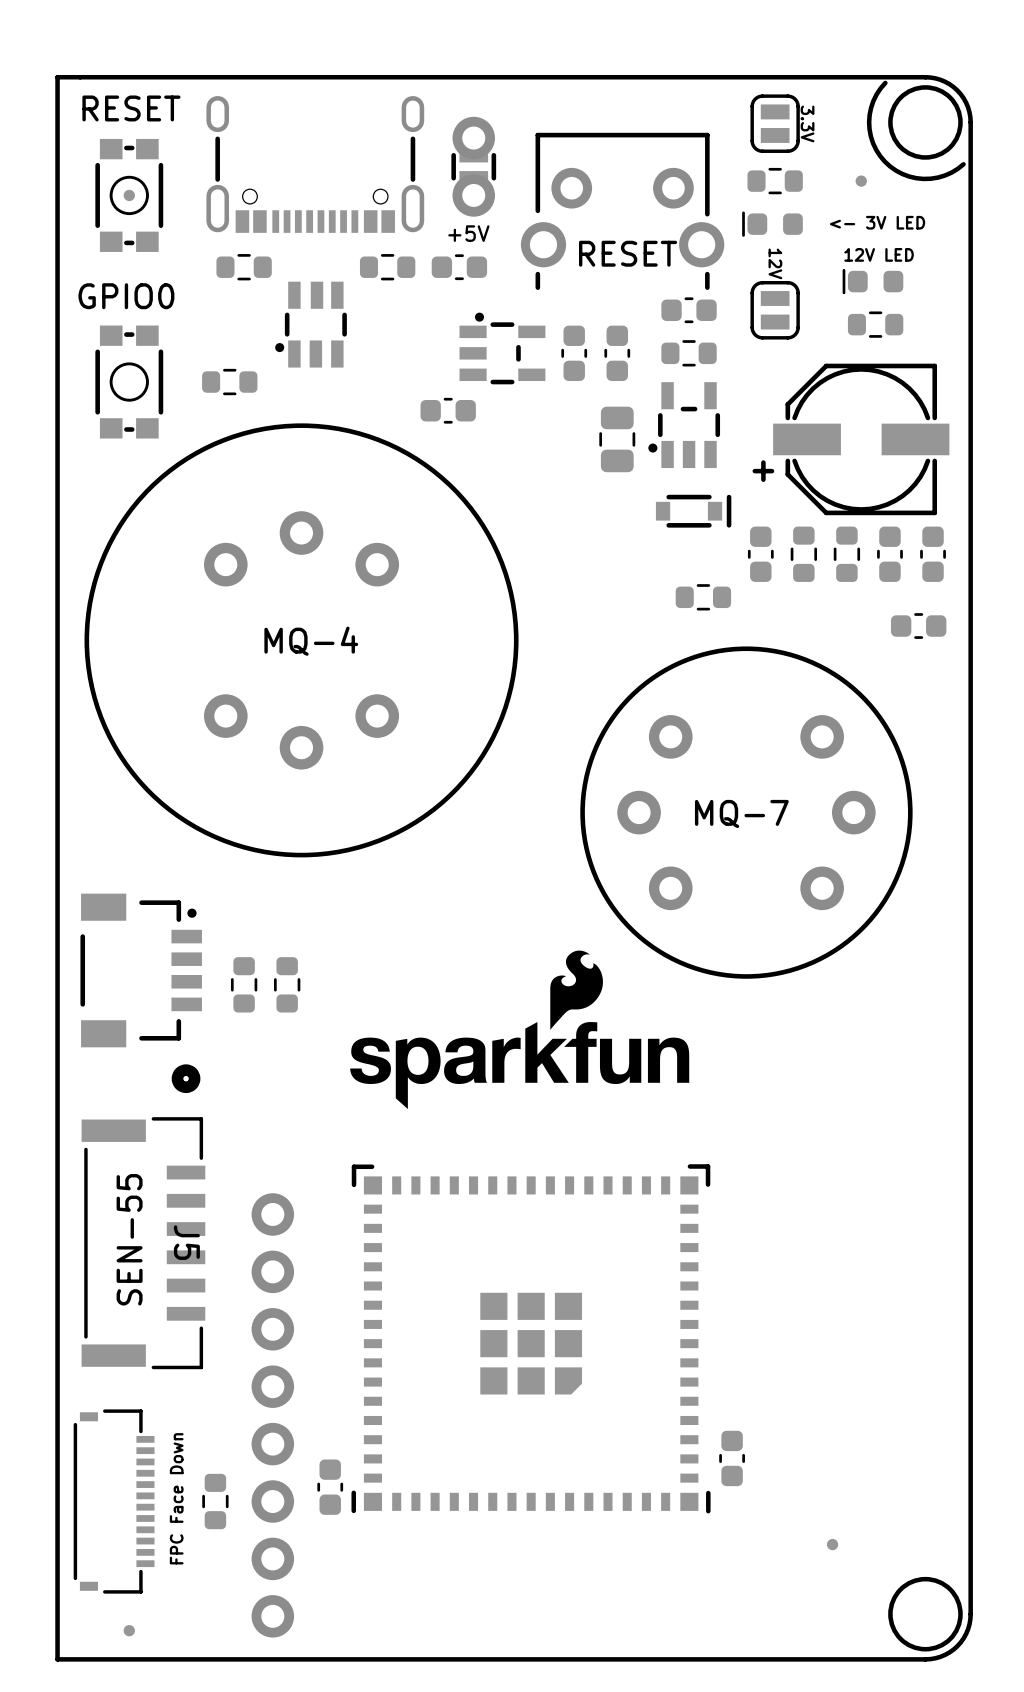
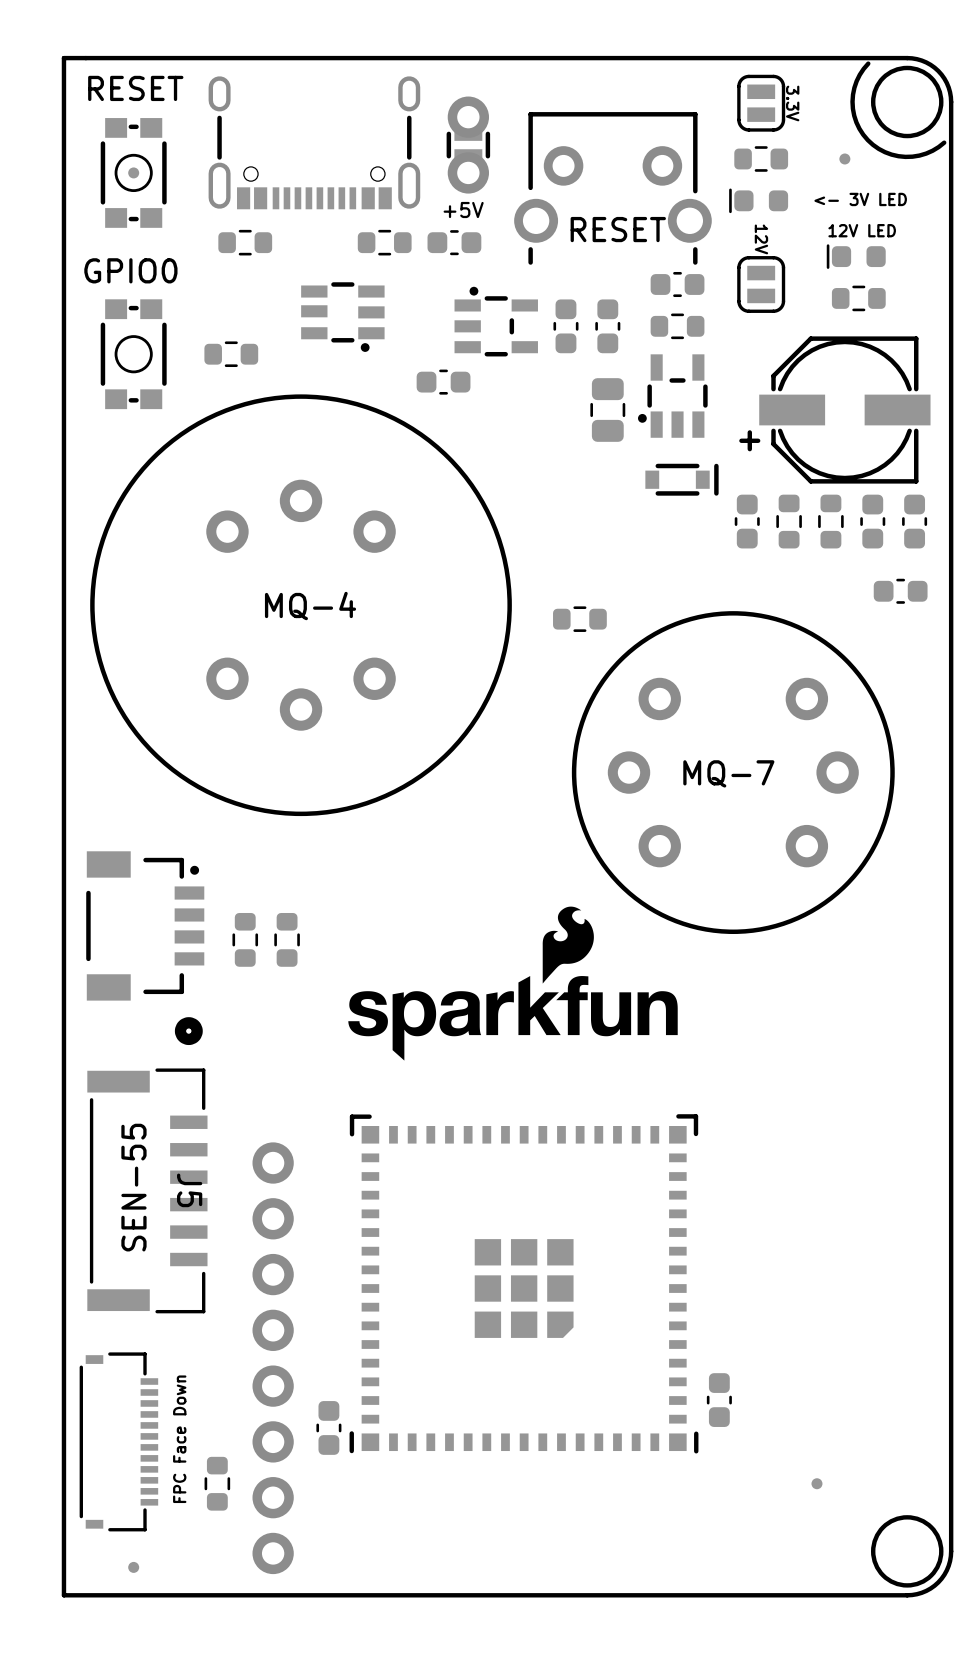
part rotation: 0° (311, 324) -> 90° counterclockwise (342, 317)
part position: (703, 597) -> (579, 619)
part position: (215, 1501) -> (217, 1483)

